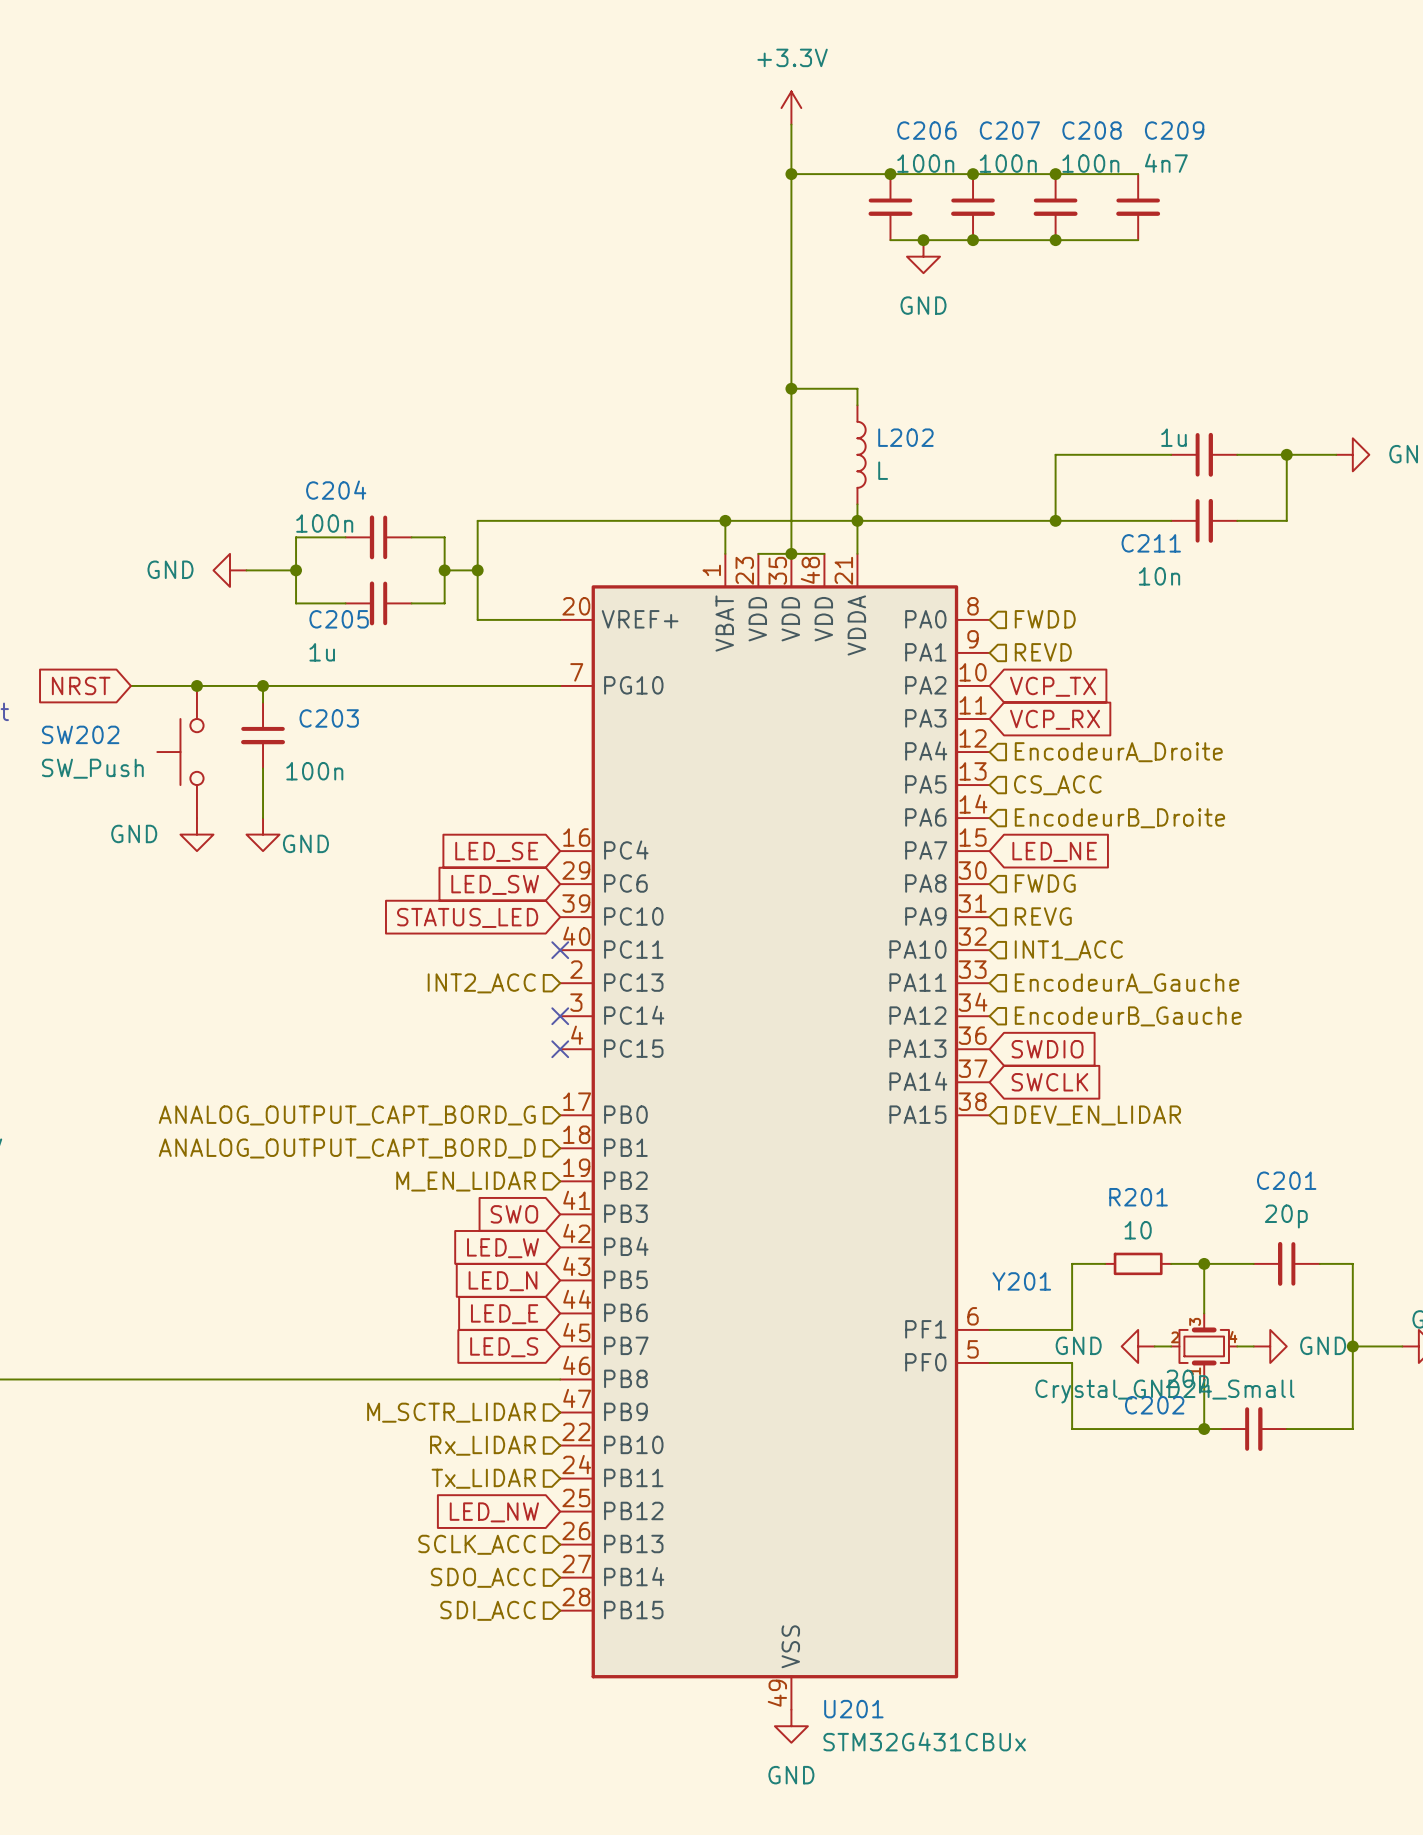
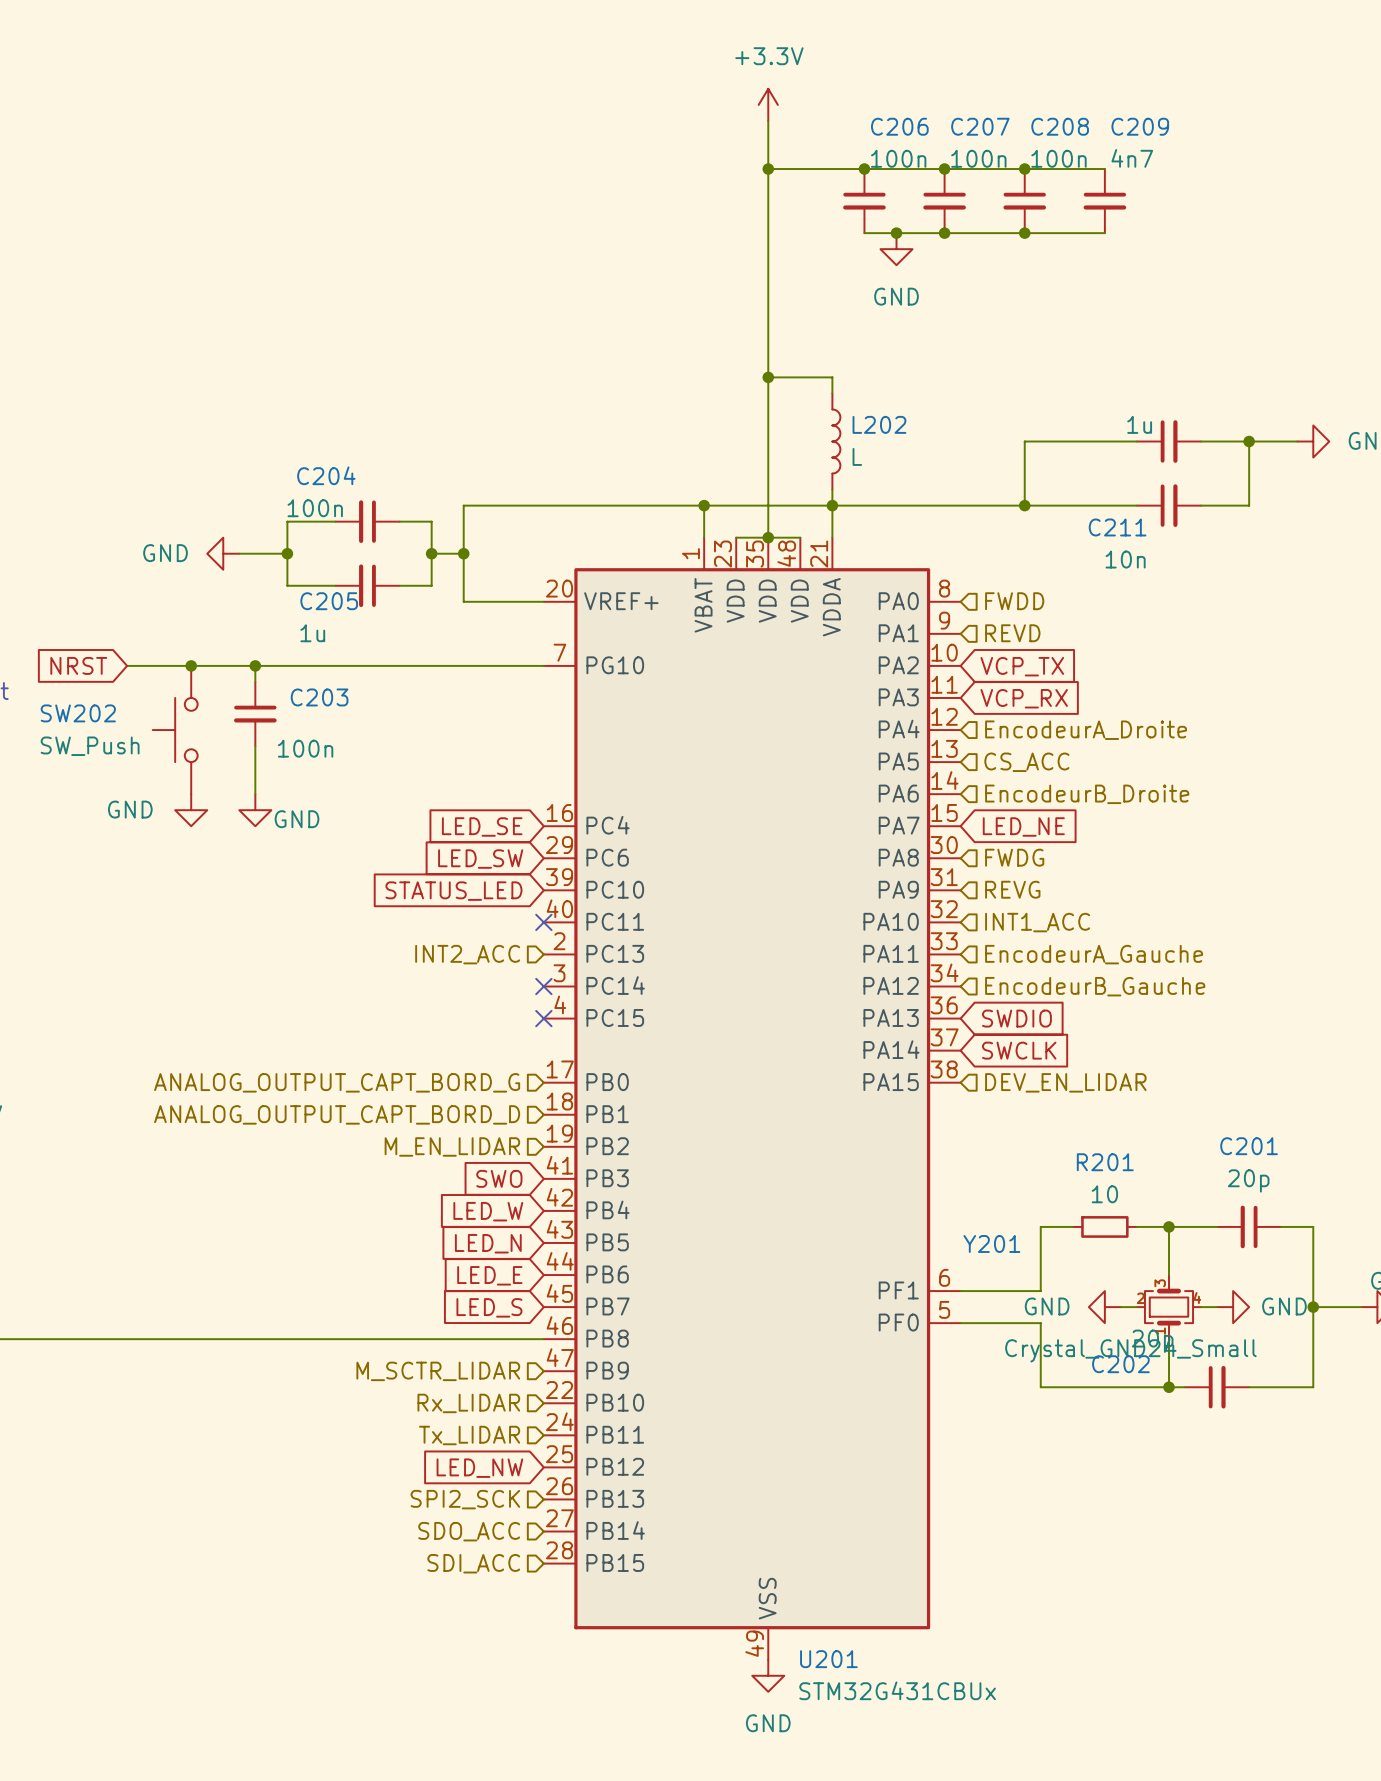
hierarchical label: SCLK_ACC (477, 1544) -> SPI2_SCK (465, 1499)

